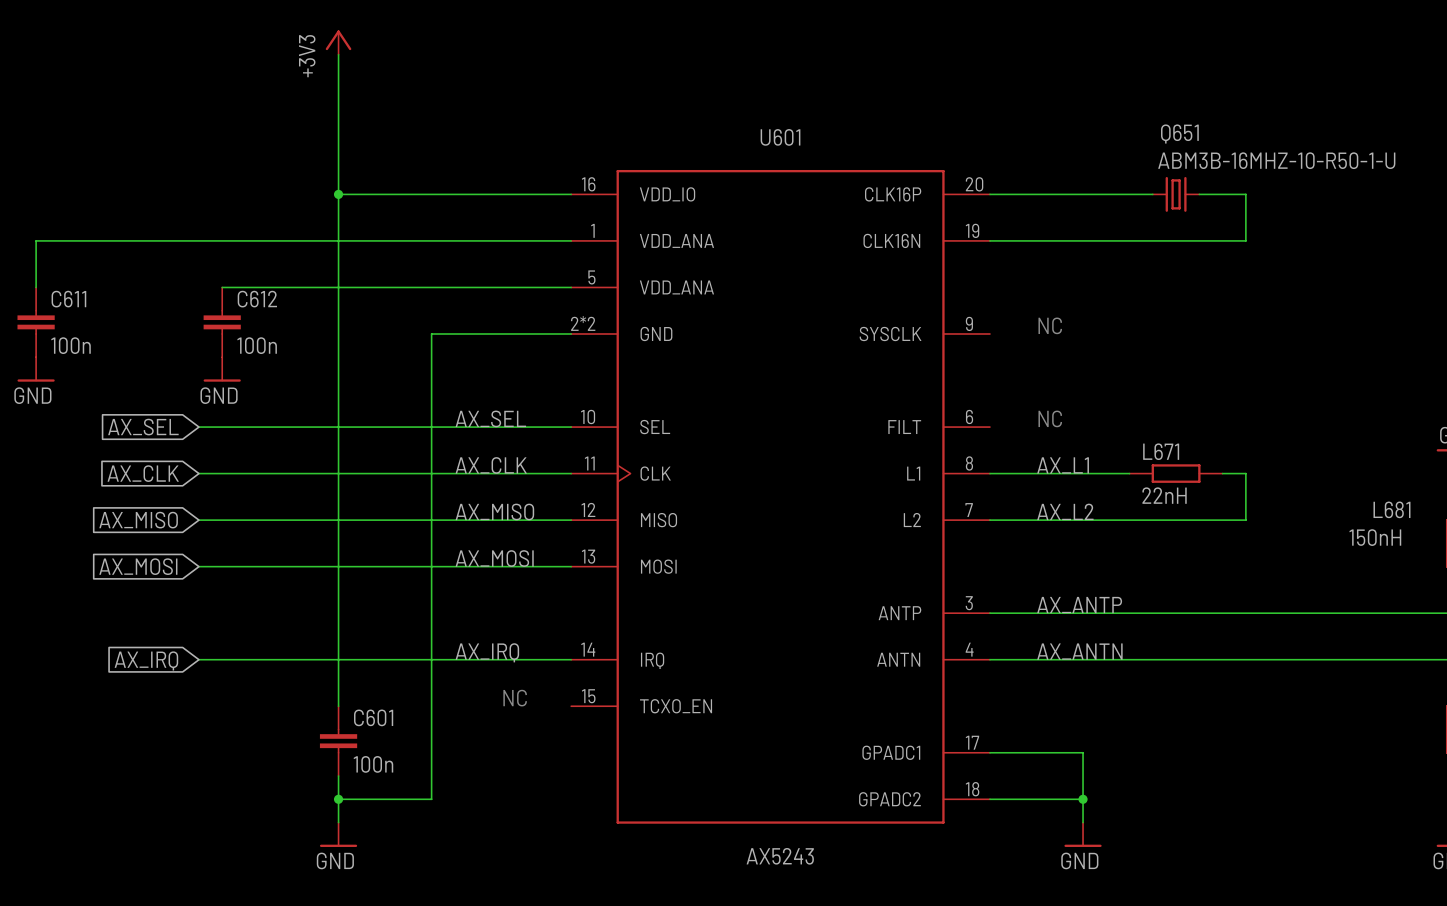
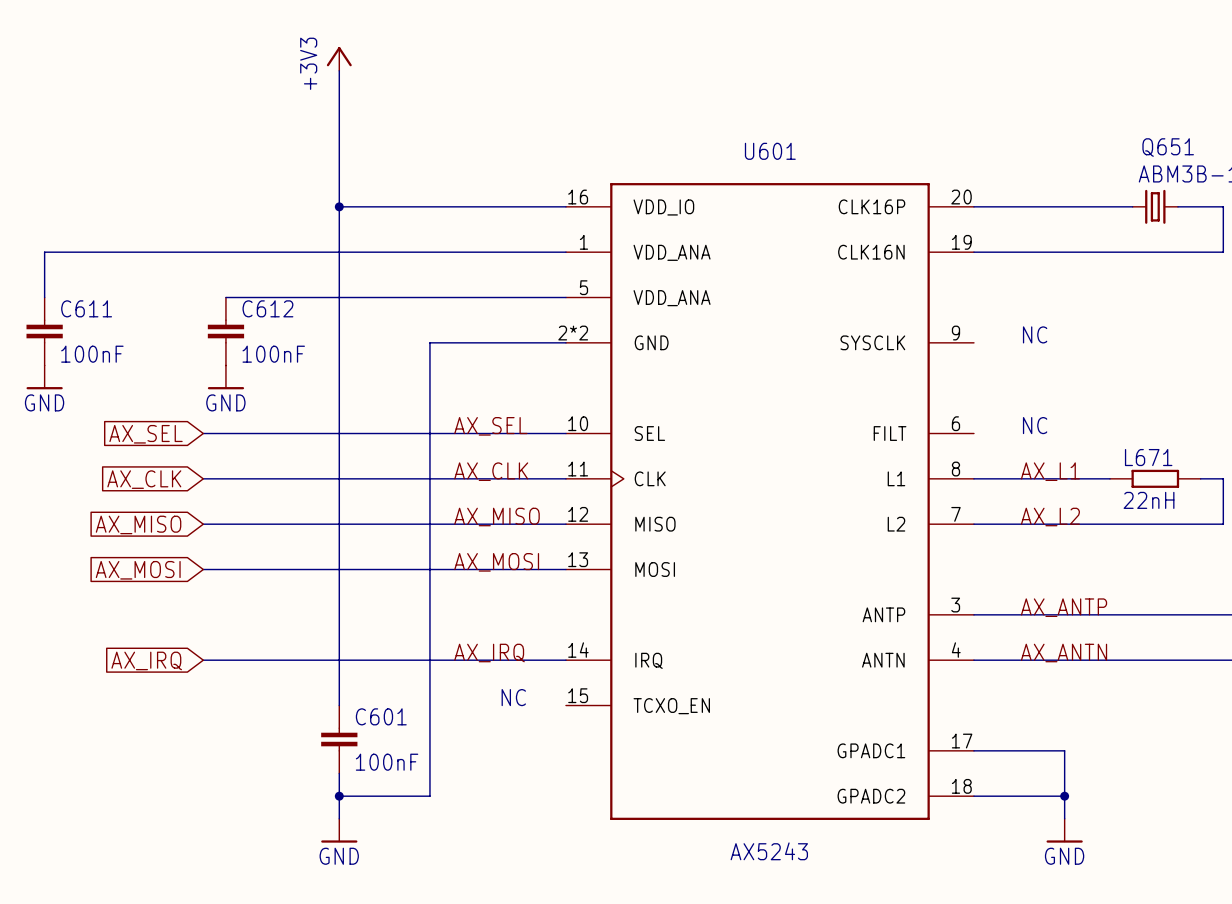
C611 value: 100n (71, 345) -> 100nF (92, 354)
C612 value: 100n (257, 345) -> 100nF (273, 354)
C601 value: 100n (373, 764) -> 100nF (387, 762)

